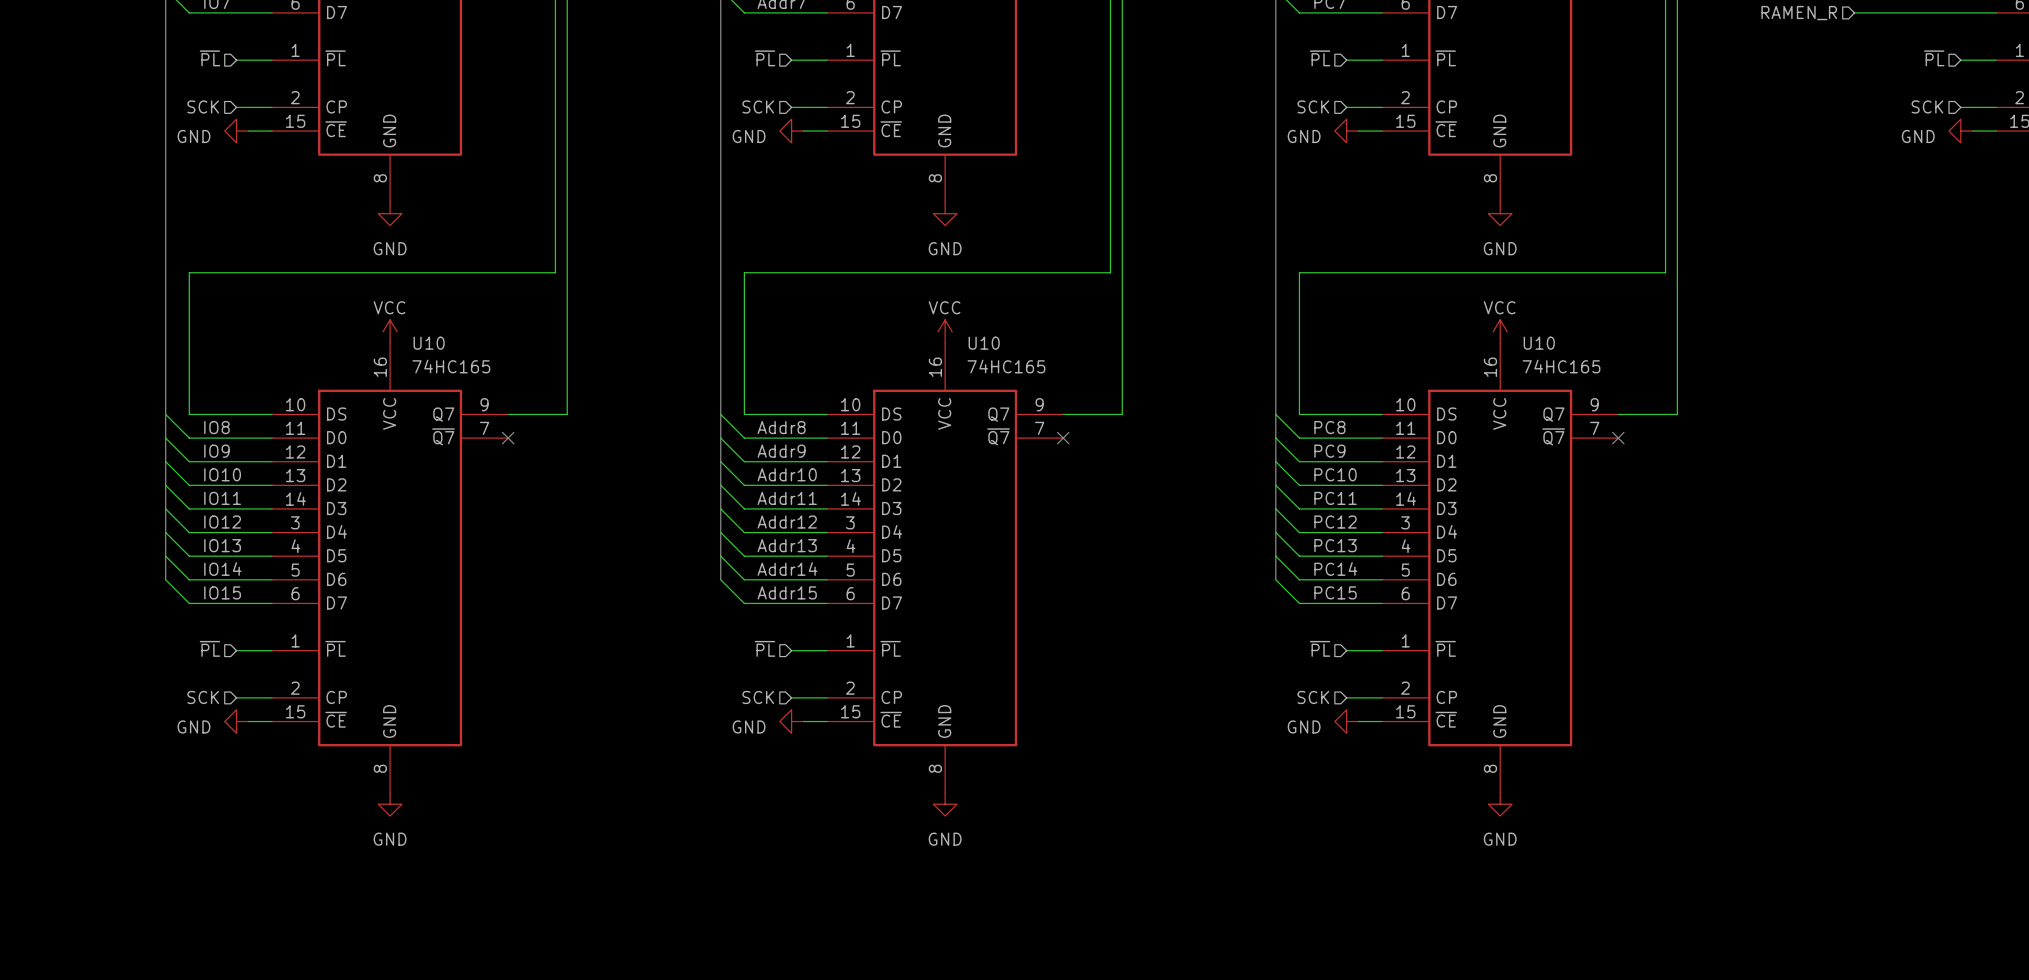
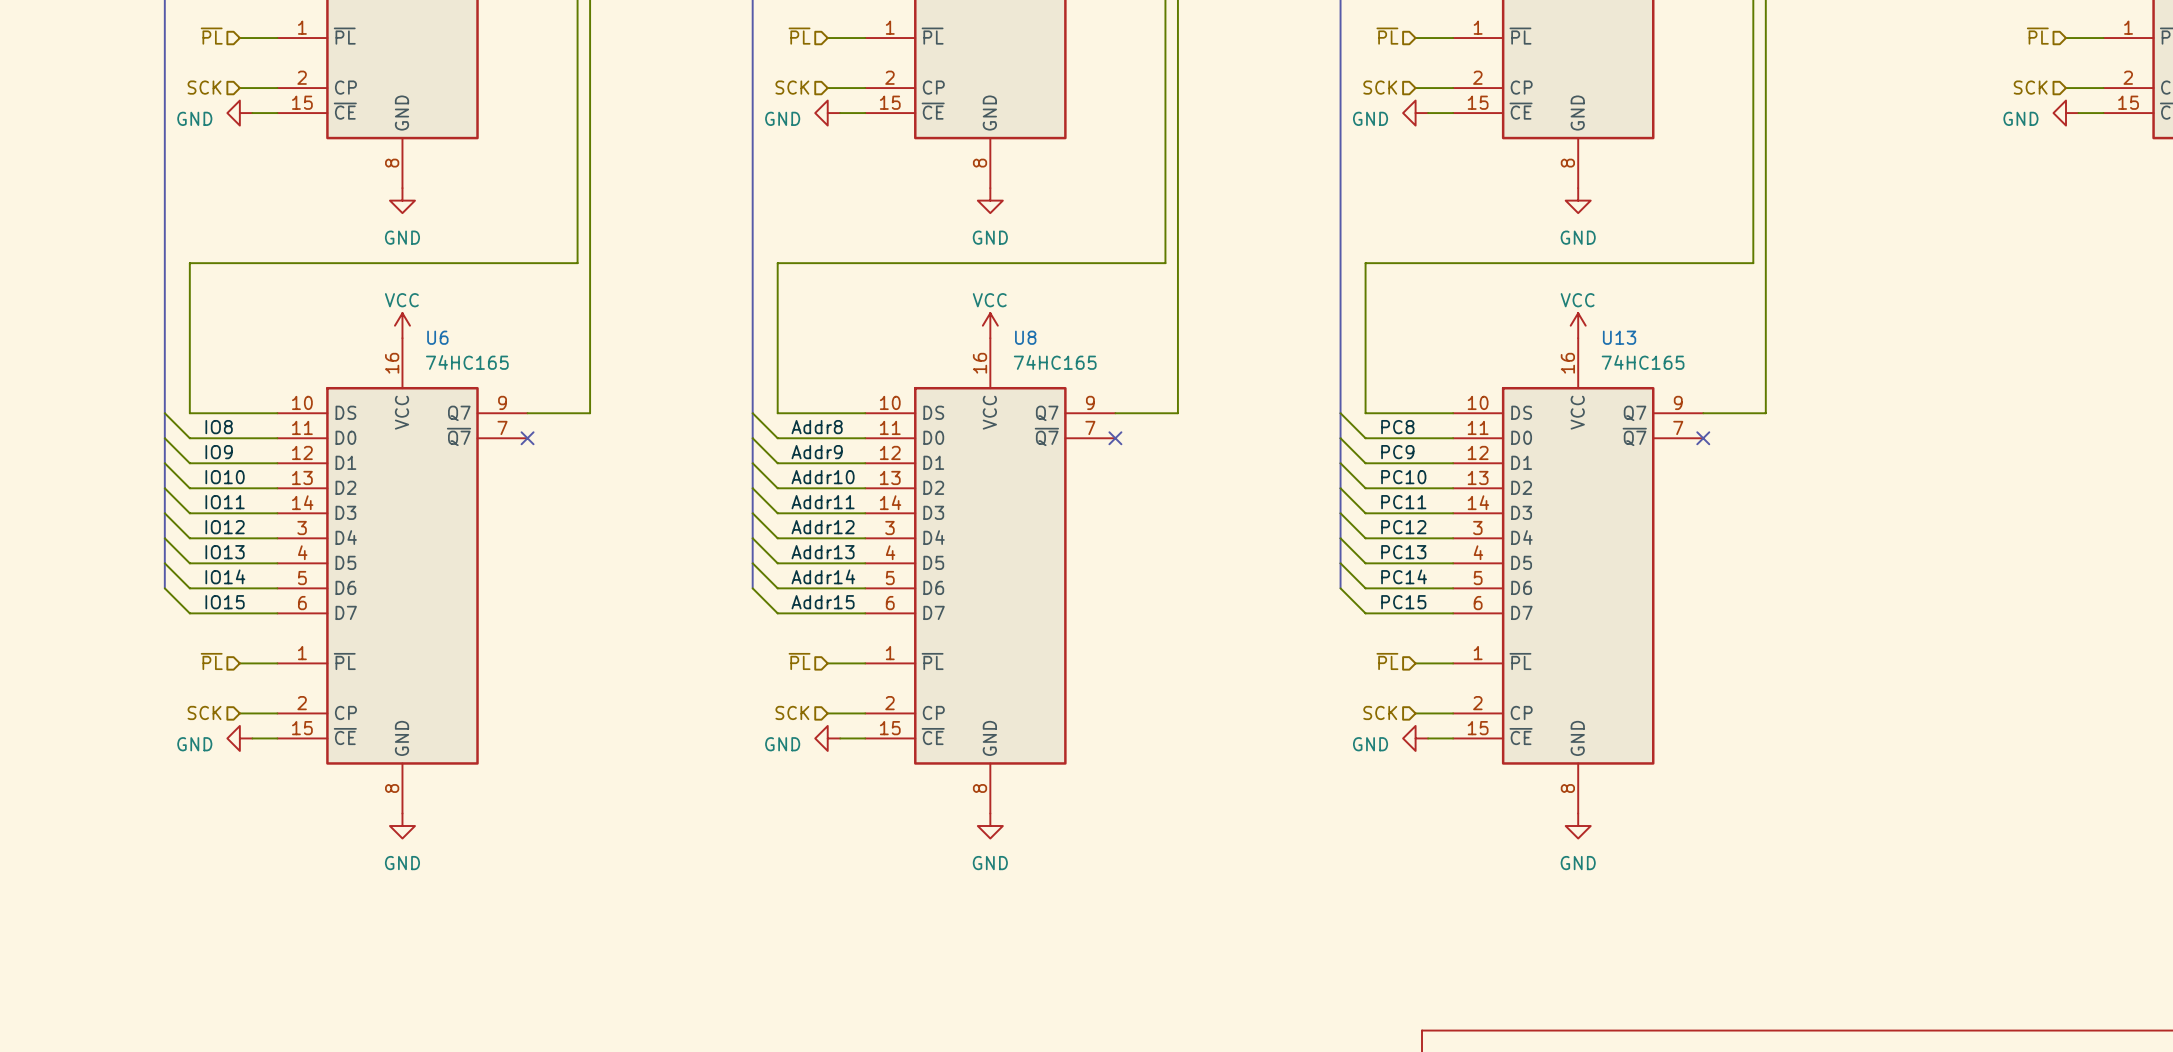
U10 name: U10 (429, 343) -> U6 (437, 337)
U10 name: U10 (984, 343) -> U8 (1025, 337)
U10 name: U10 (1539, 343) -> U13 (1619, 337)

